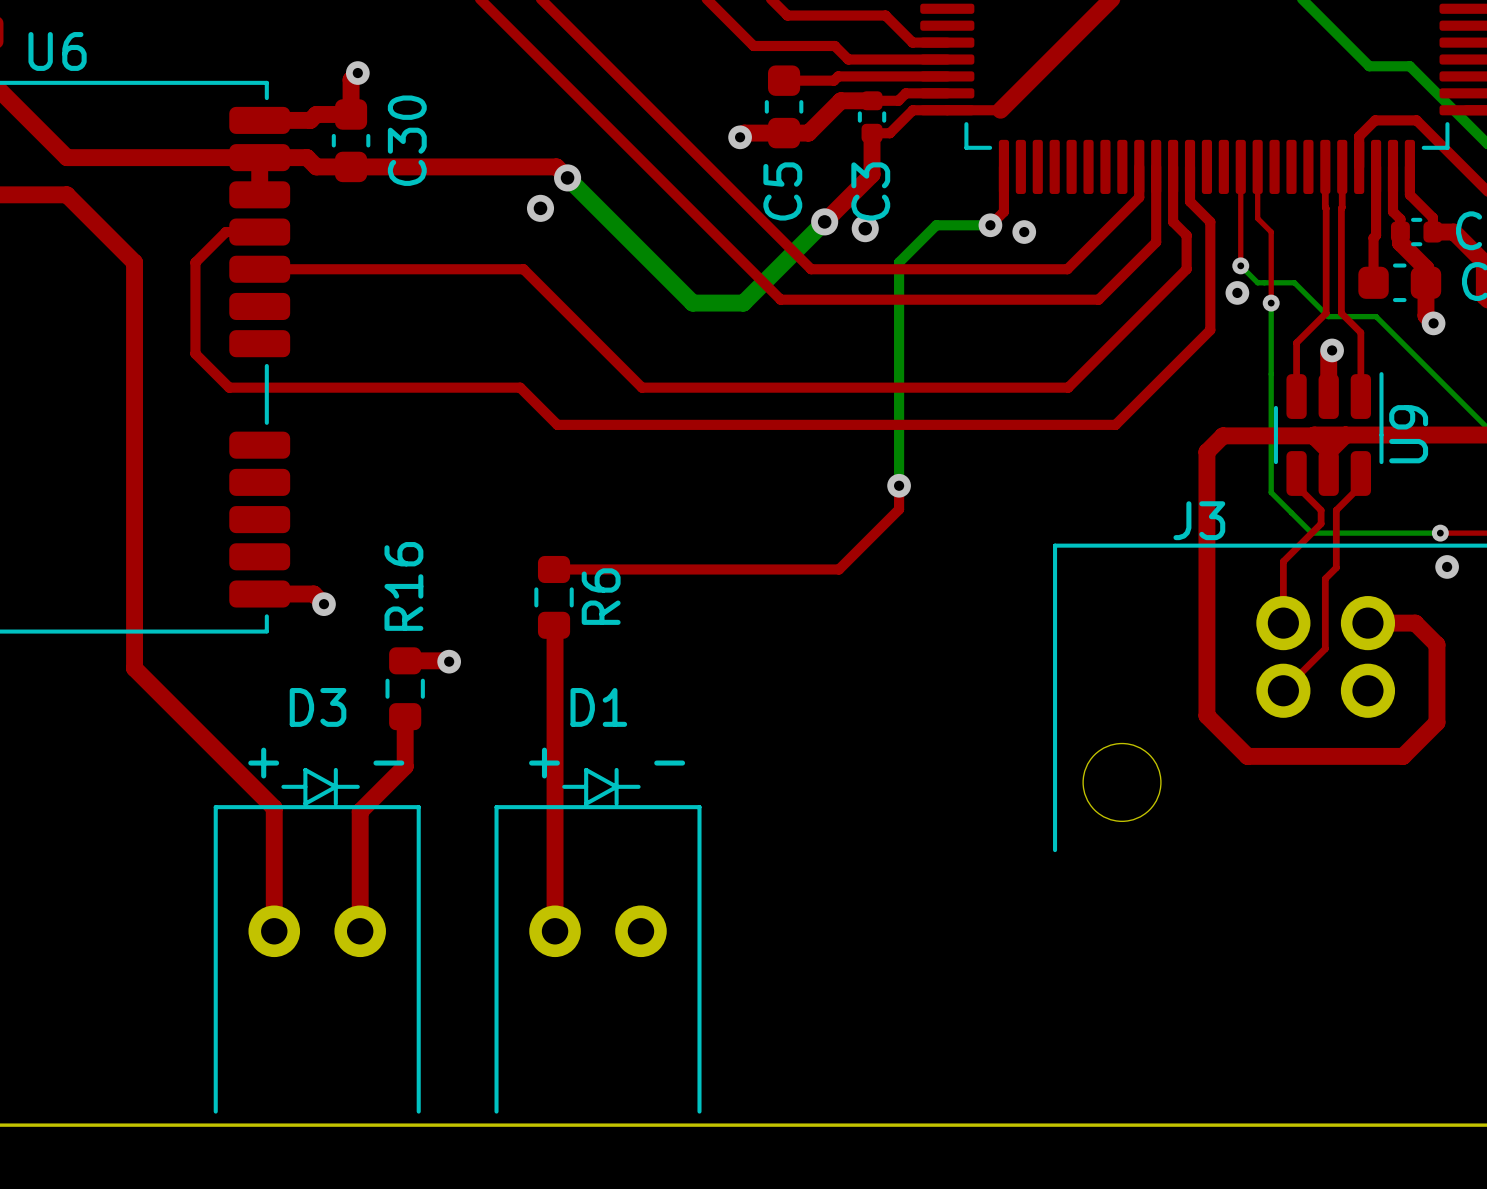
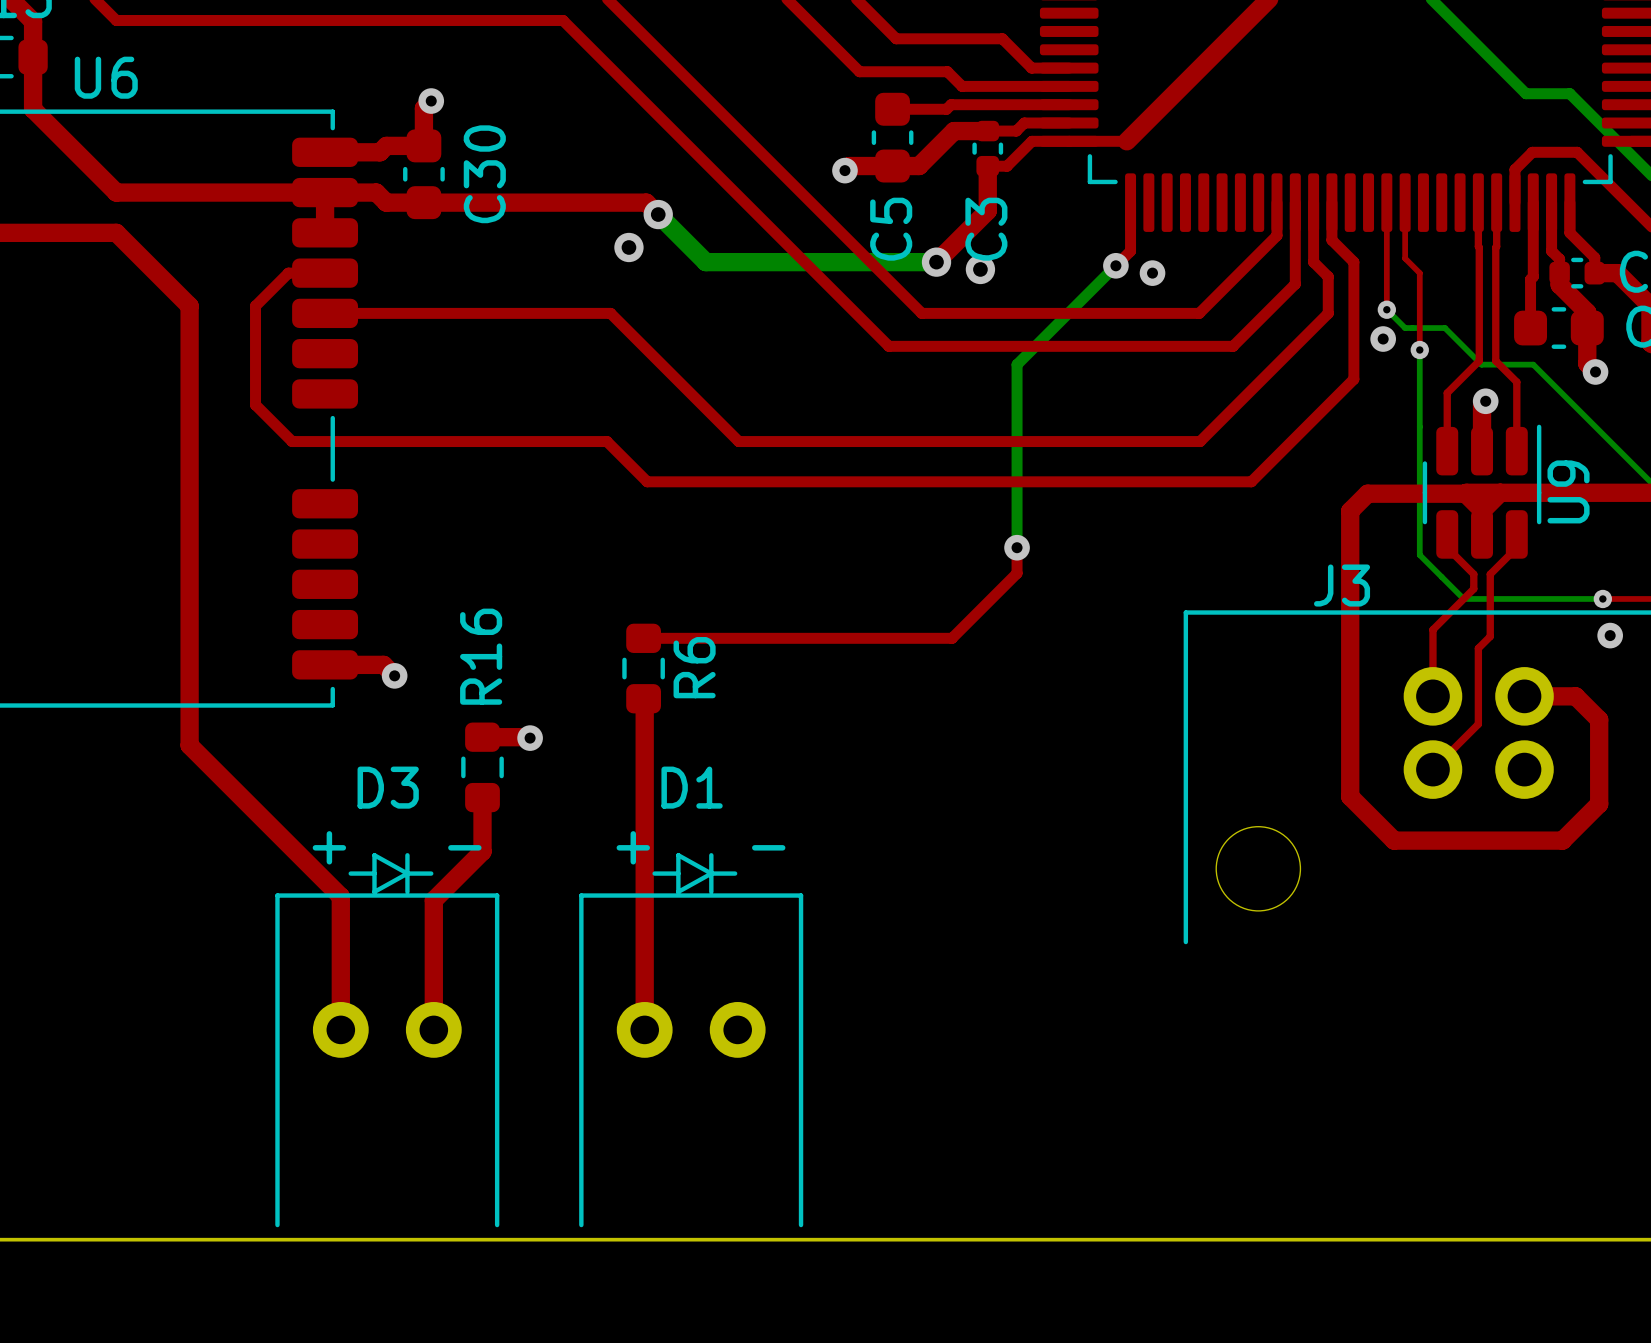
bottom track: (611, 221) (692, 303) (743, 303) (824, 221) -> (705, 262) (936, 262)
bottom track: (990, 225) (936, 225) (899, 262) (899, 316) -> (1115, 265) (1017, 364)

